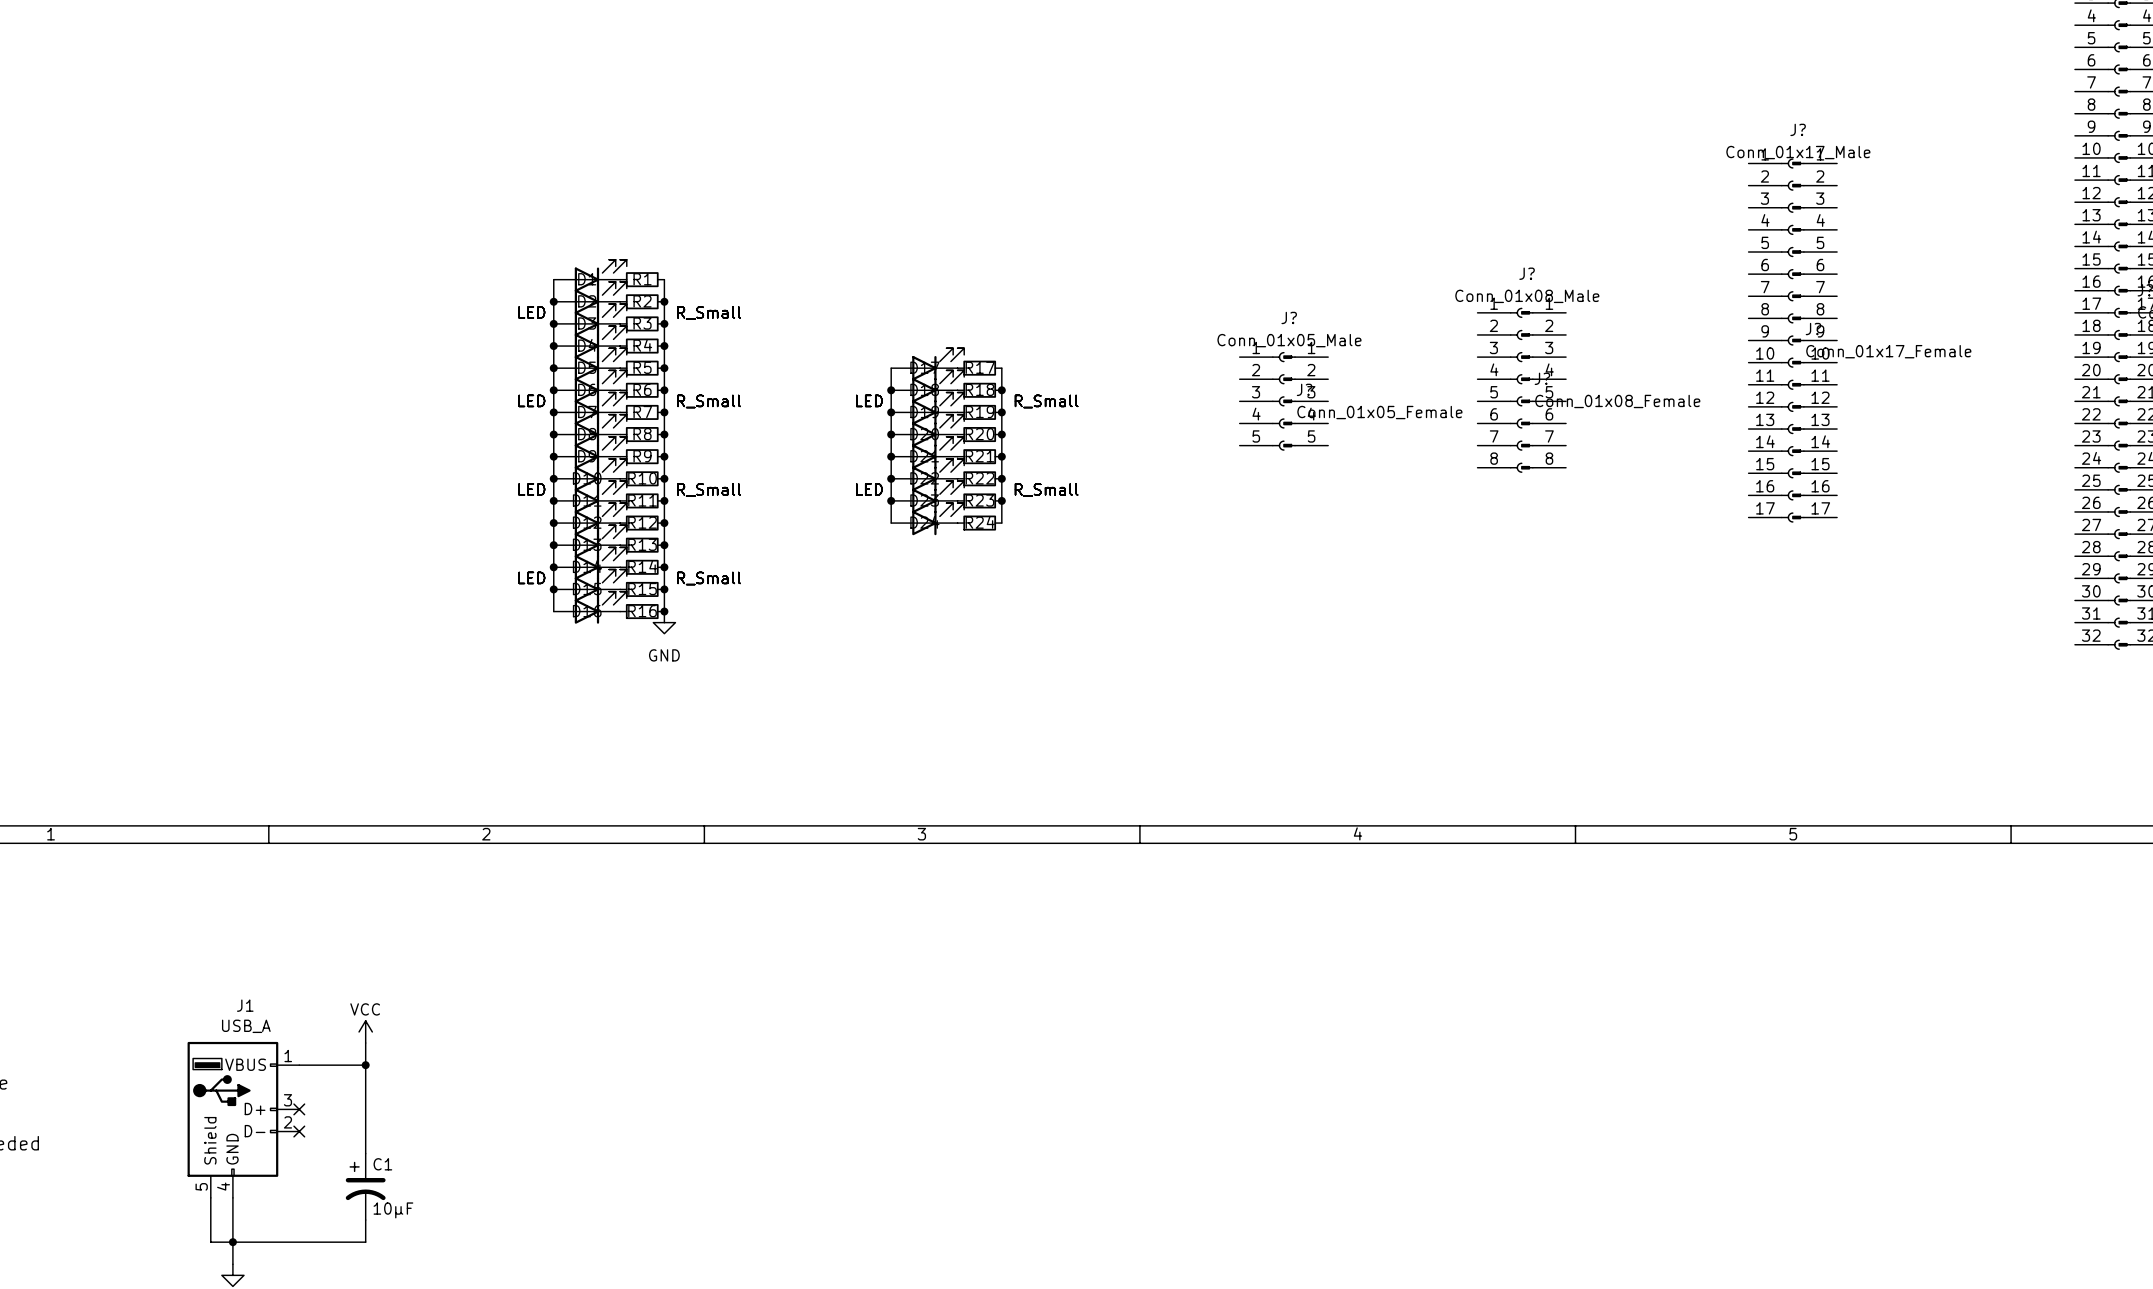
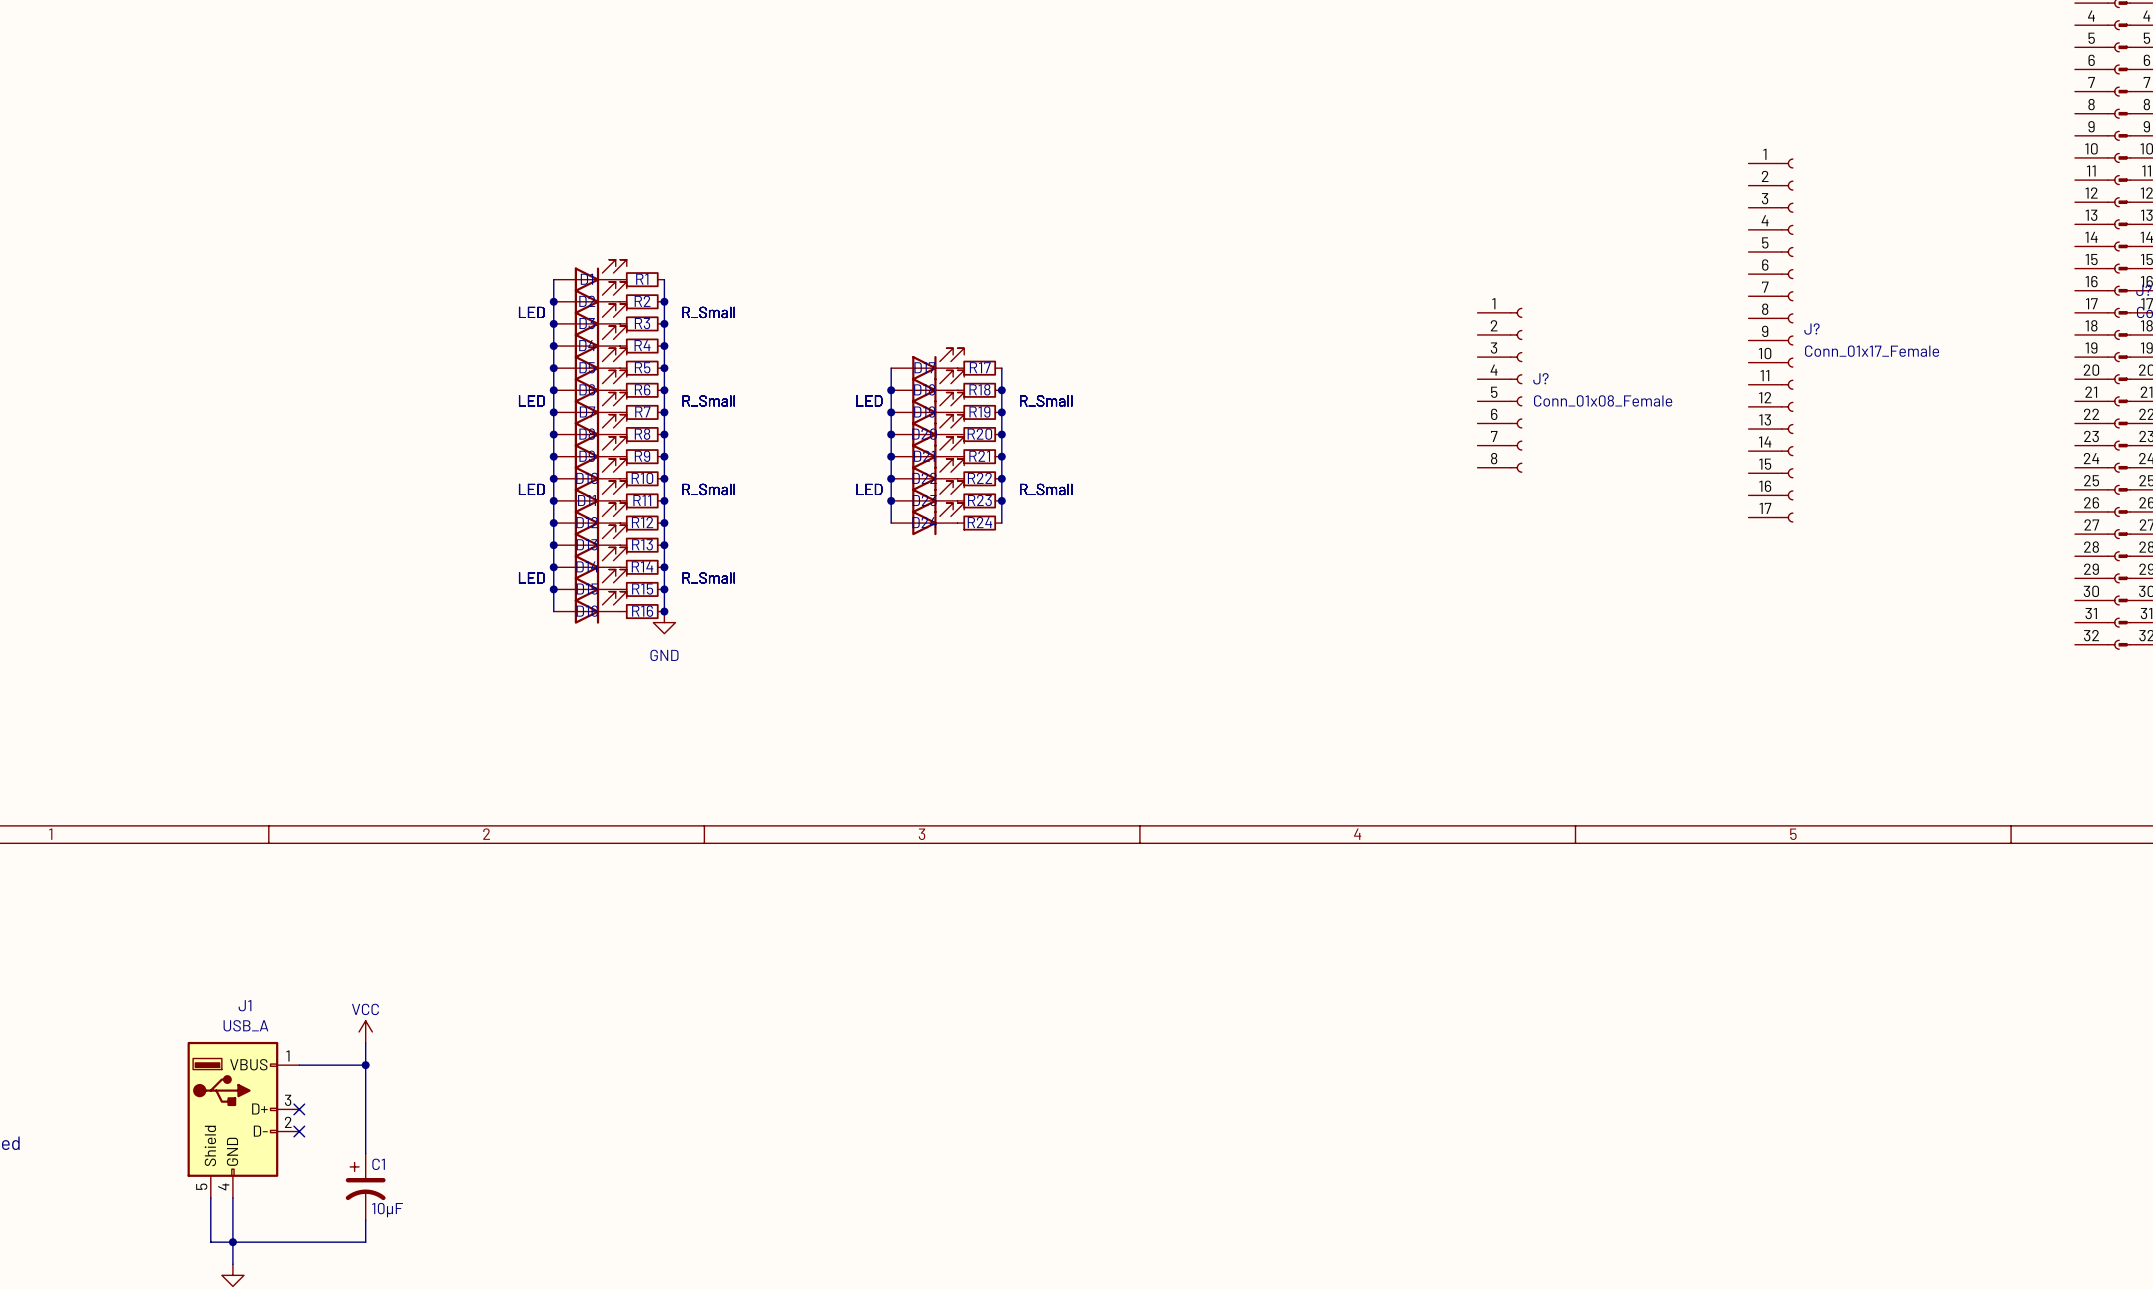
J?: Conn_01x17_Male (1814, 340) -> none
J?: Conn_01x08_Male (1543, 390) -> none
J?: Conn_01x05_Female (1262, 401) -> none
J?: Conn_01x05_Male (1305, 401) -> none

